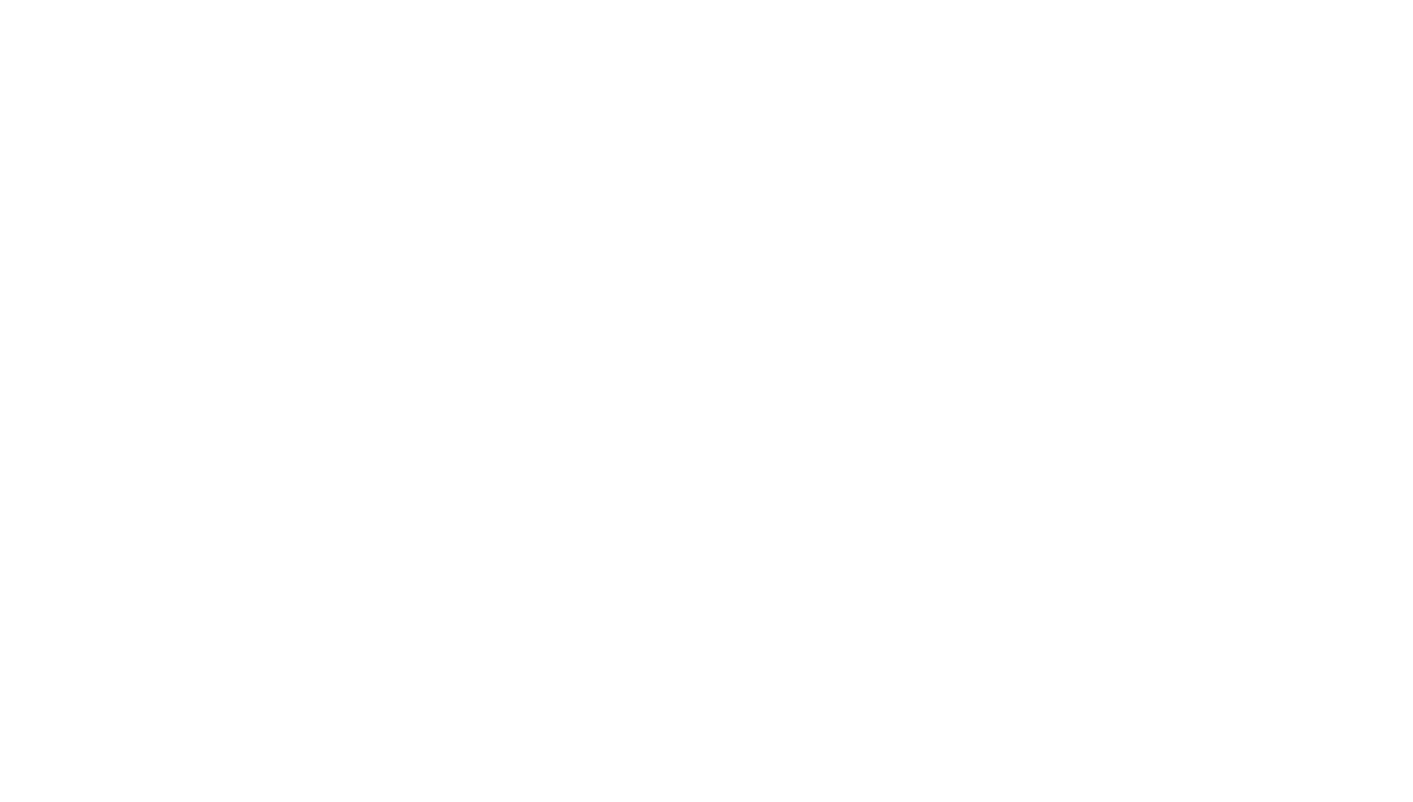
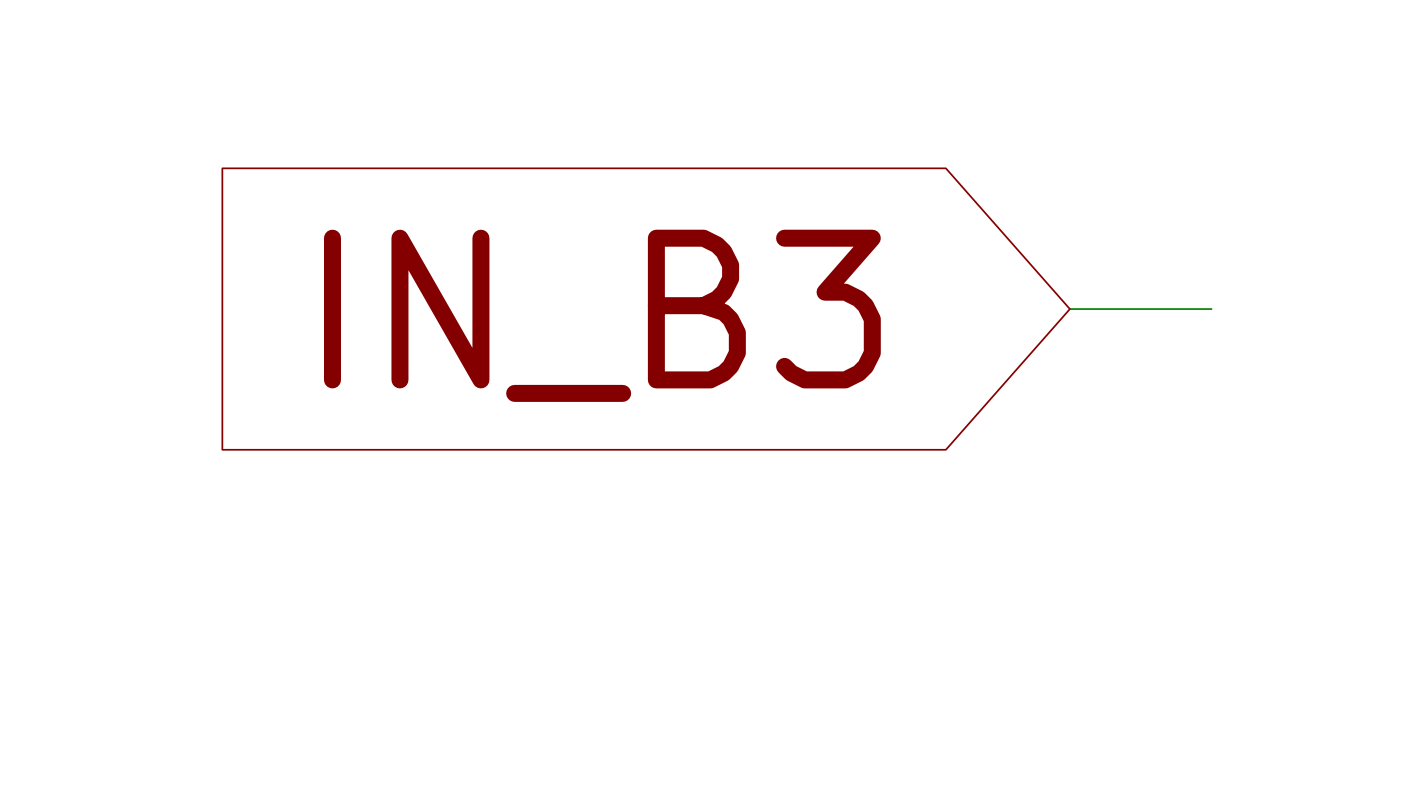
wire: none -> (1069, 309) (1211, 309)
global label: none -> IN_B3 (602, 315)

